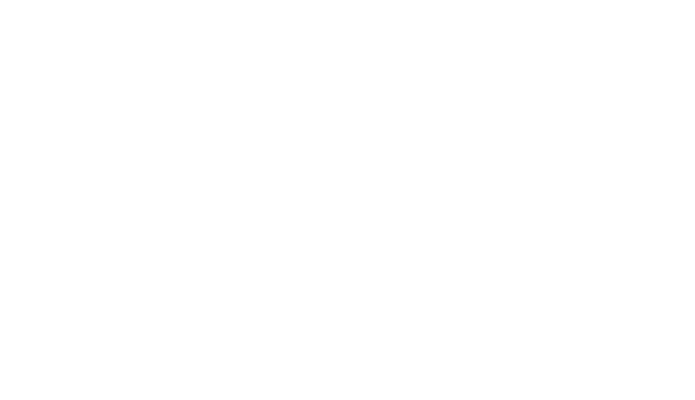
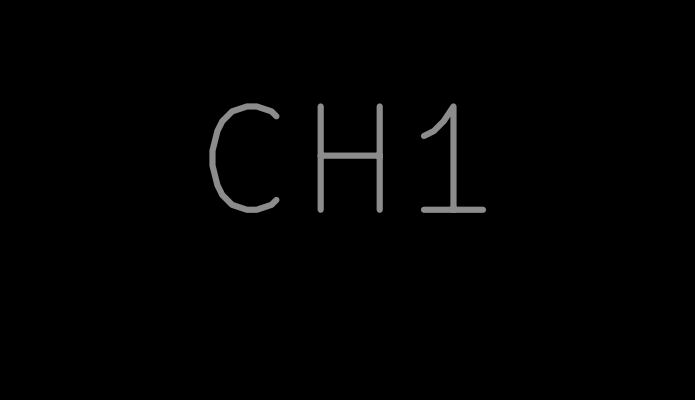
text: none -> CH1 (347, 158)

